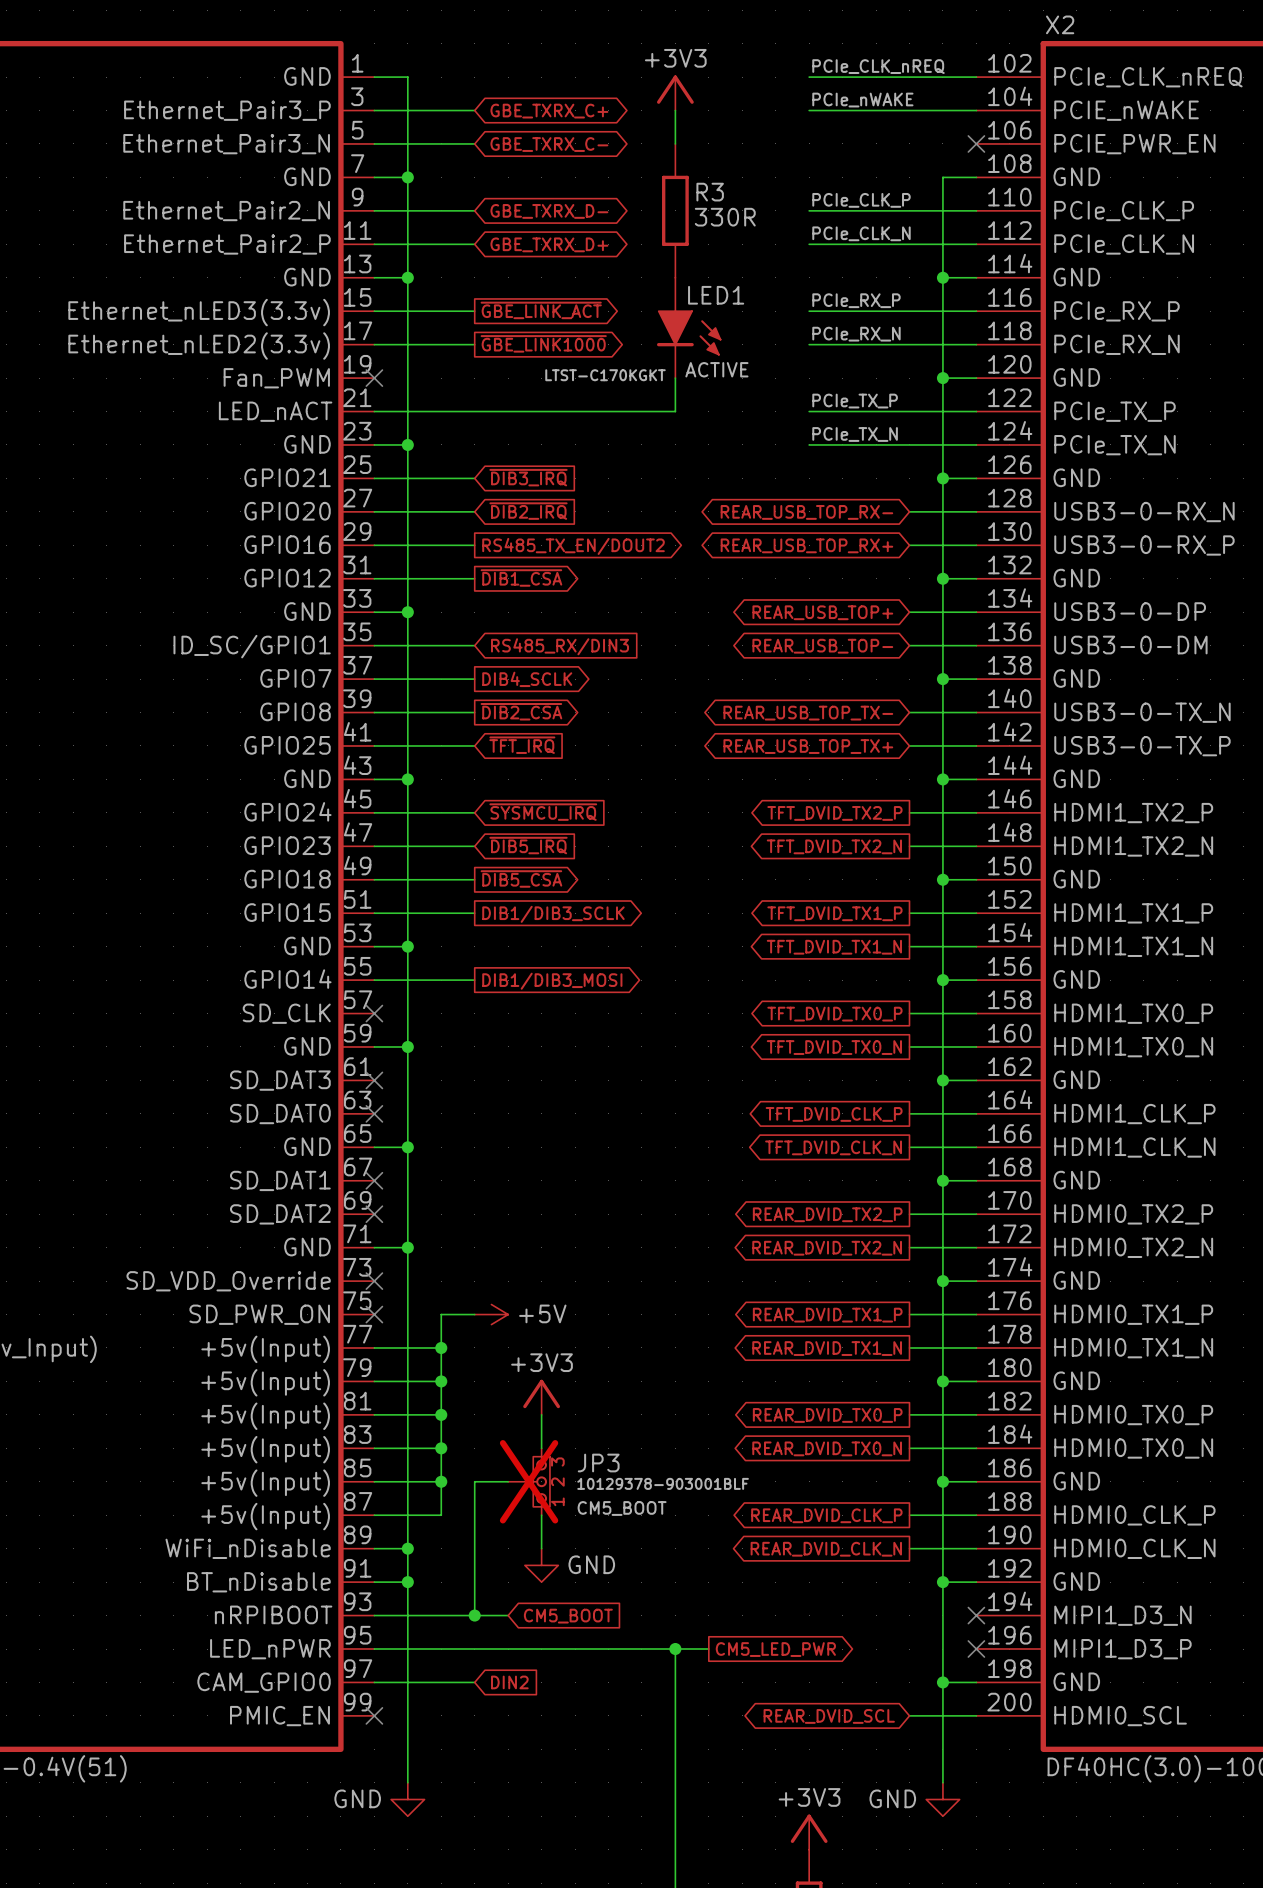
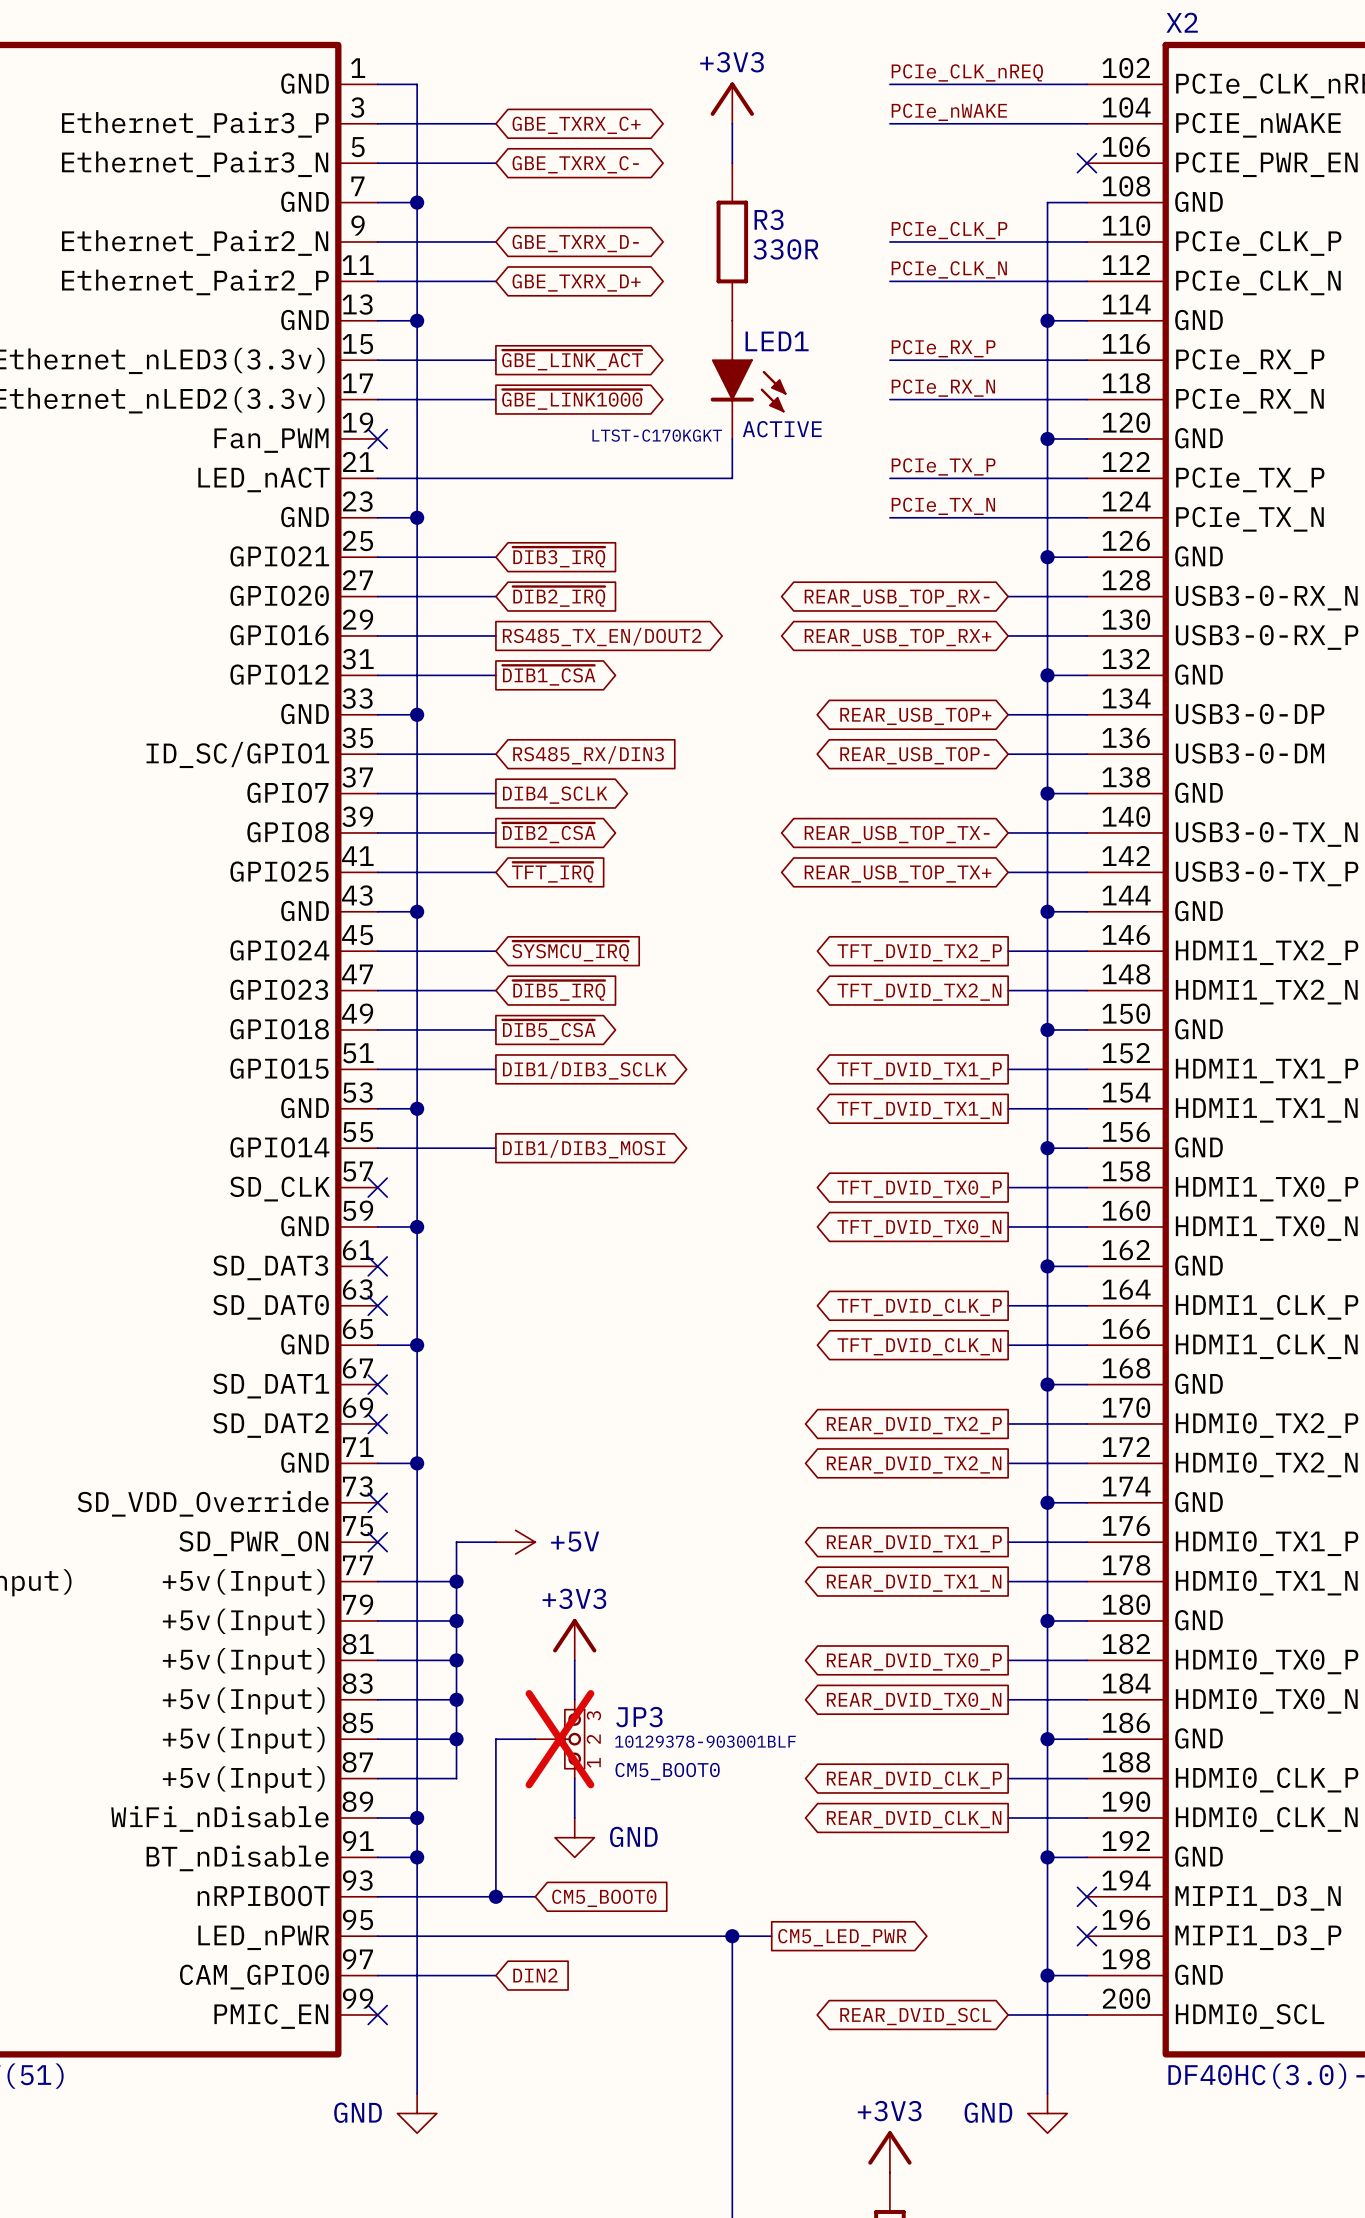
JP3 text: CM5_BOOT (622, 1508) -> CM5_BOOT0 (667, 1771)
global label: CM5_BOOT (568, 1616) -> CM5_BOOT0 (604, 1898)

